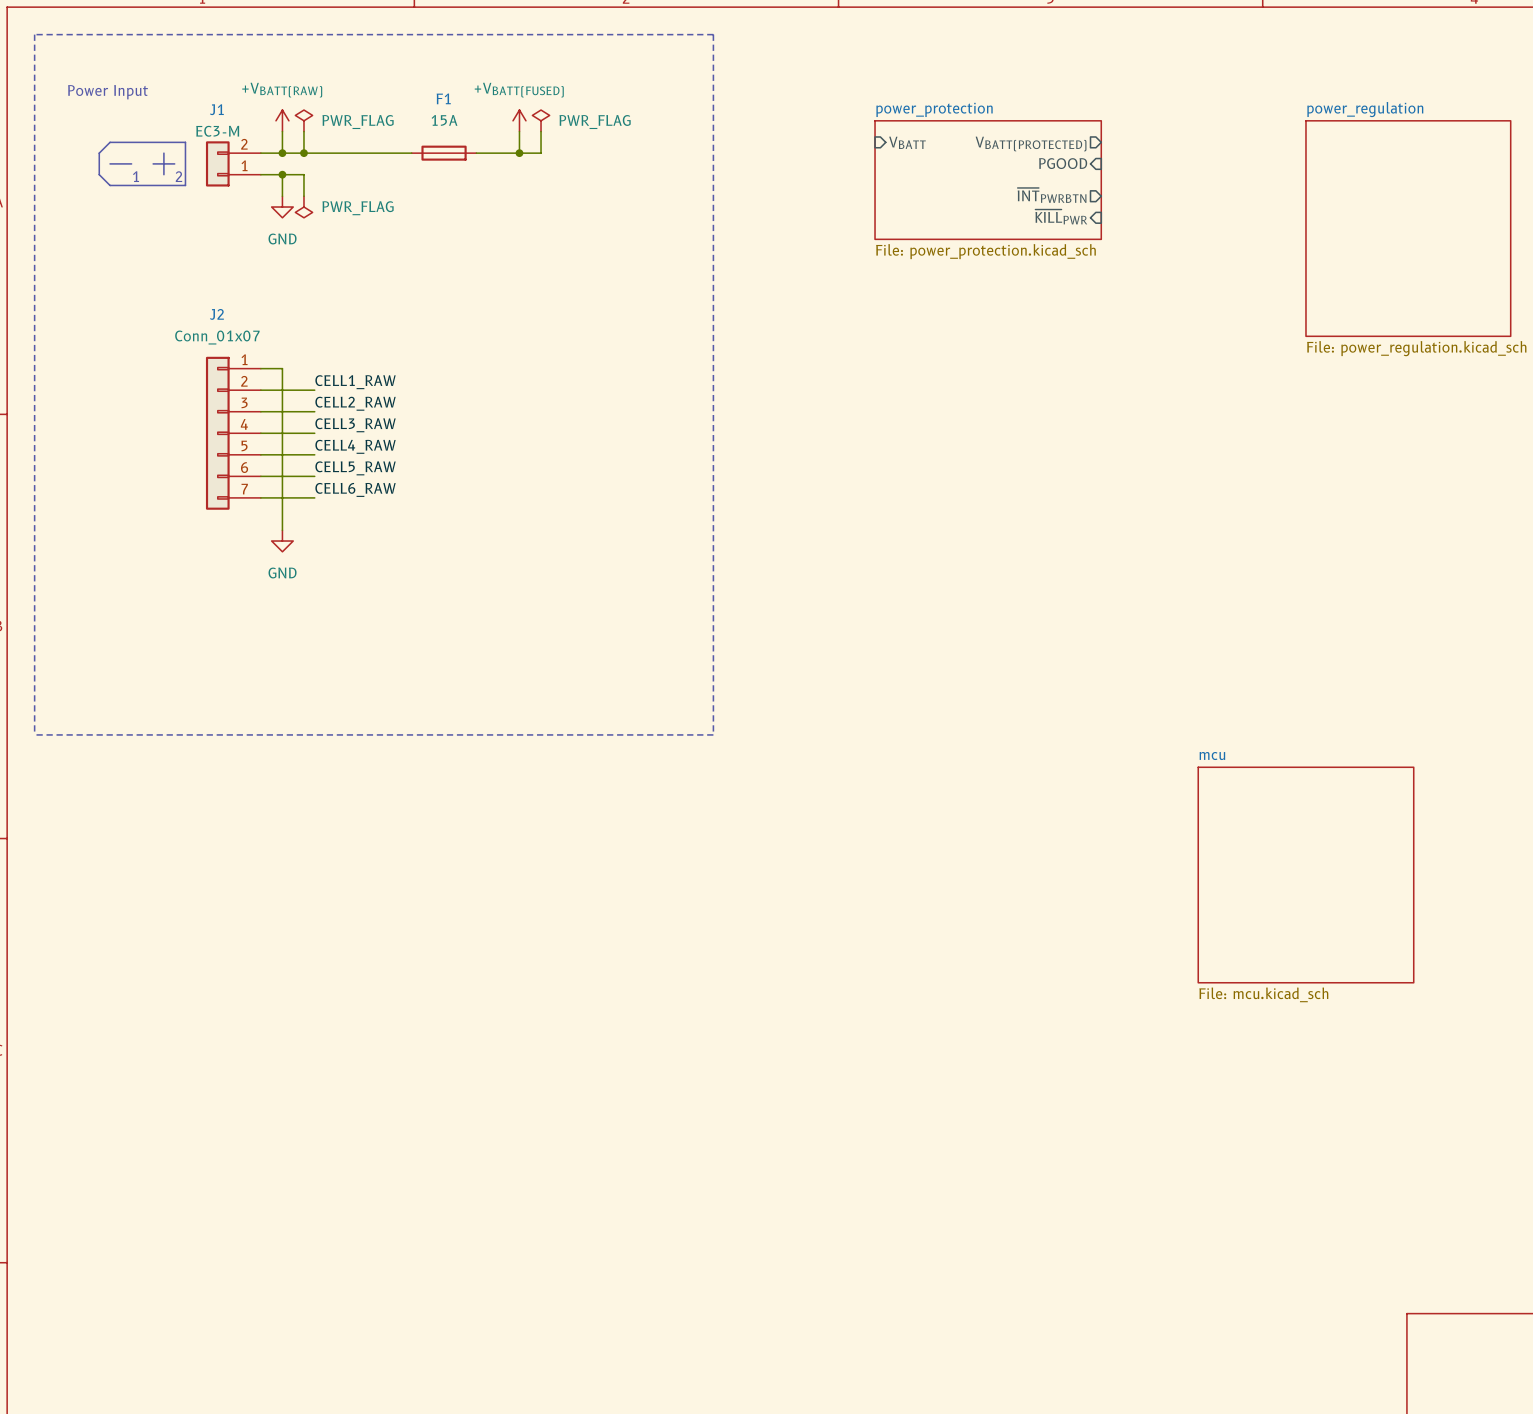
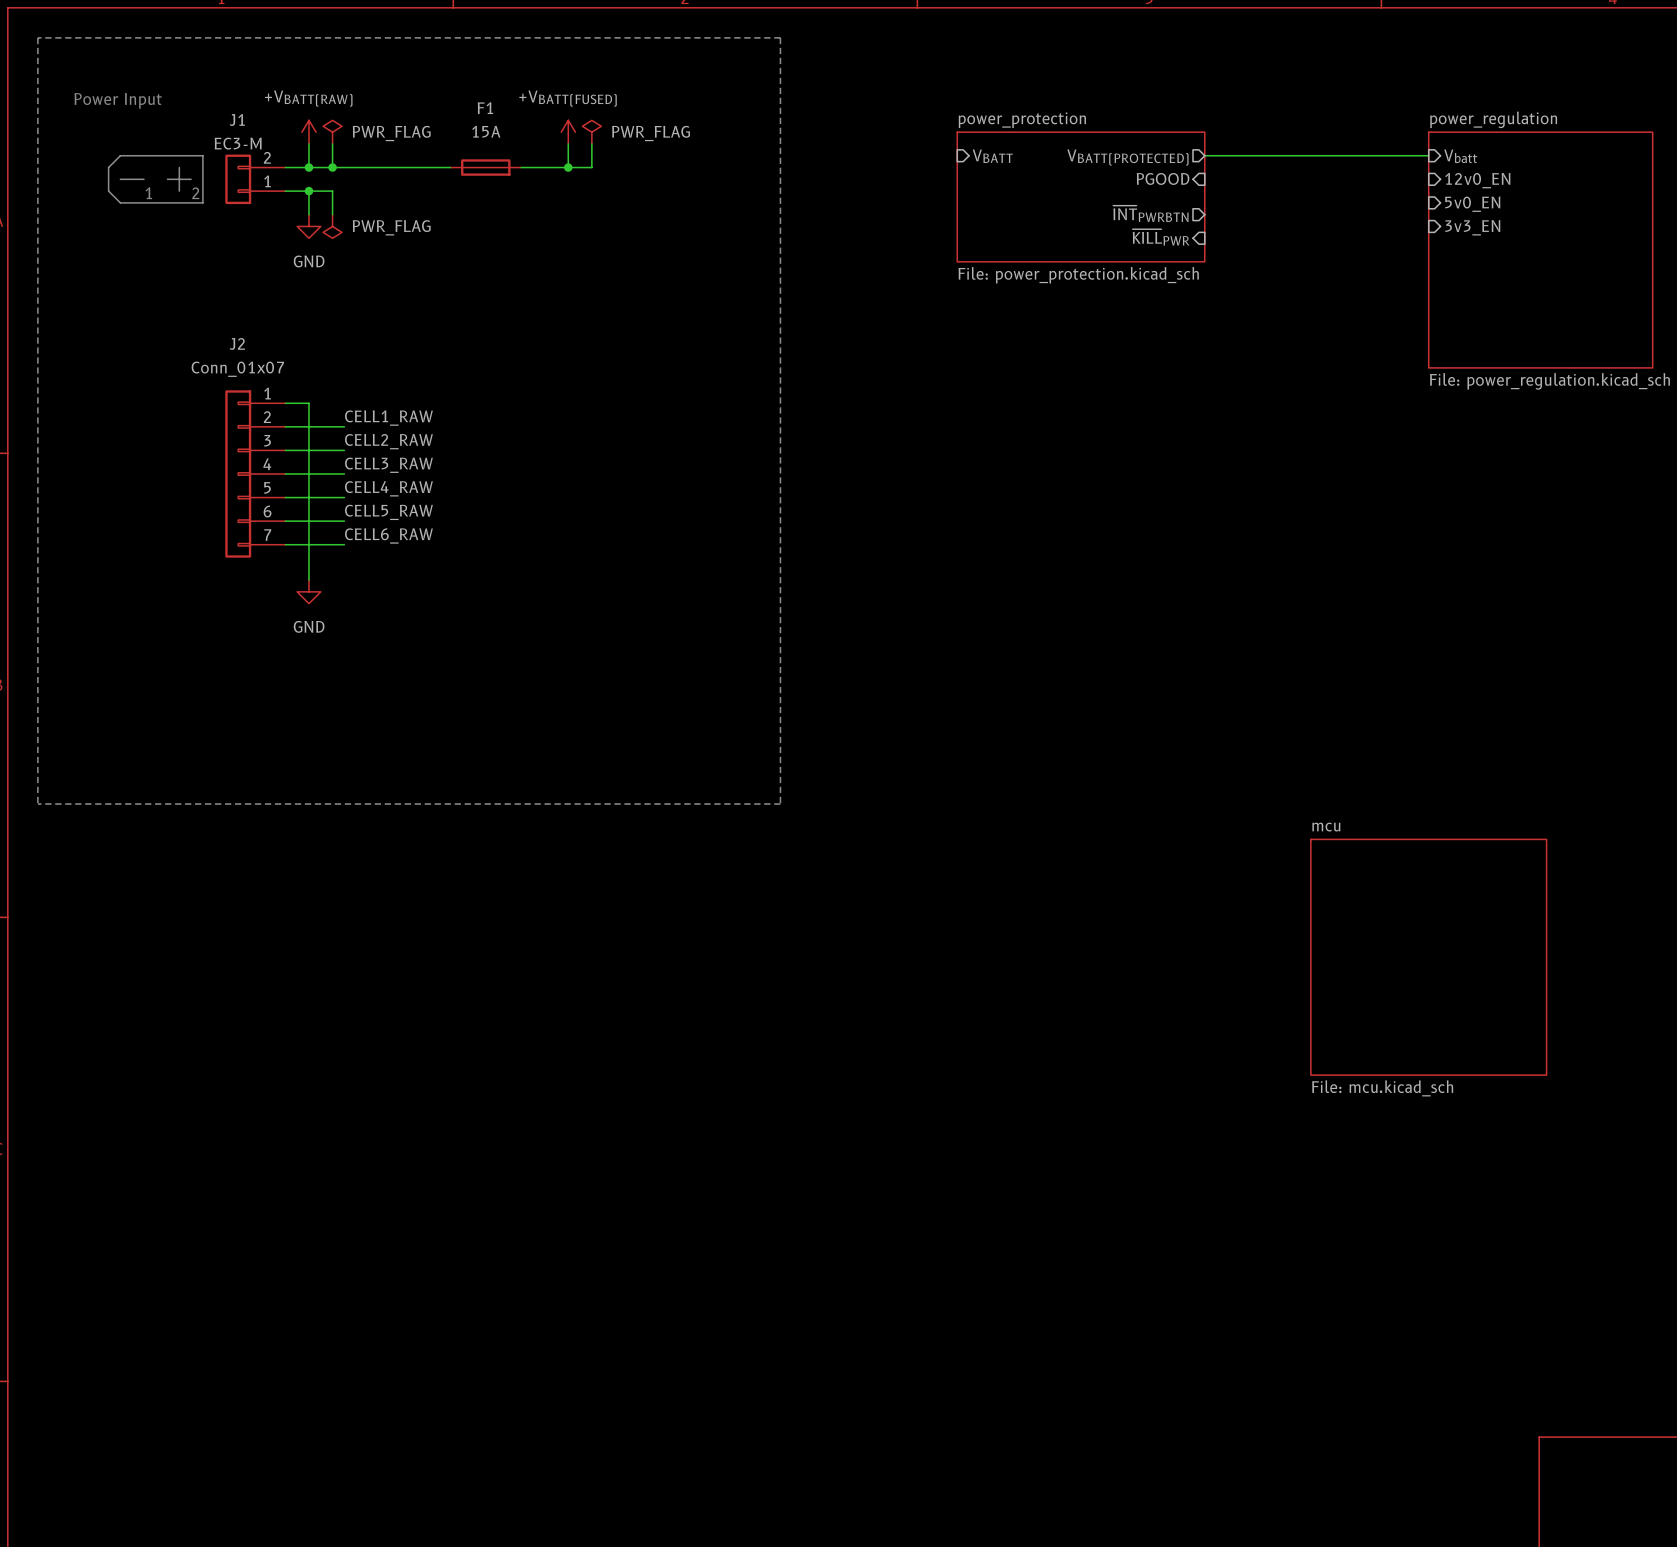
wire: none -> (1204, 155) (1428, 155)
sheet pin: none -> Vbatt (1460, 156)
sheet pin: none -> 12v0_EN (1477, 180)
sheet pin: none -> 5v0_EN (1472, 204)
sheet pin: none -> 3v3_EN (1472, 227)

